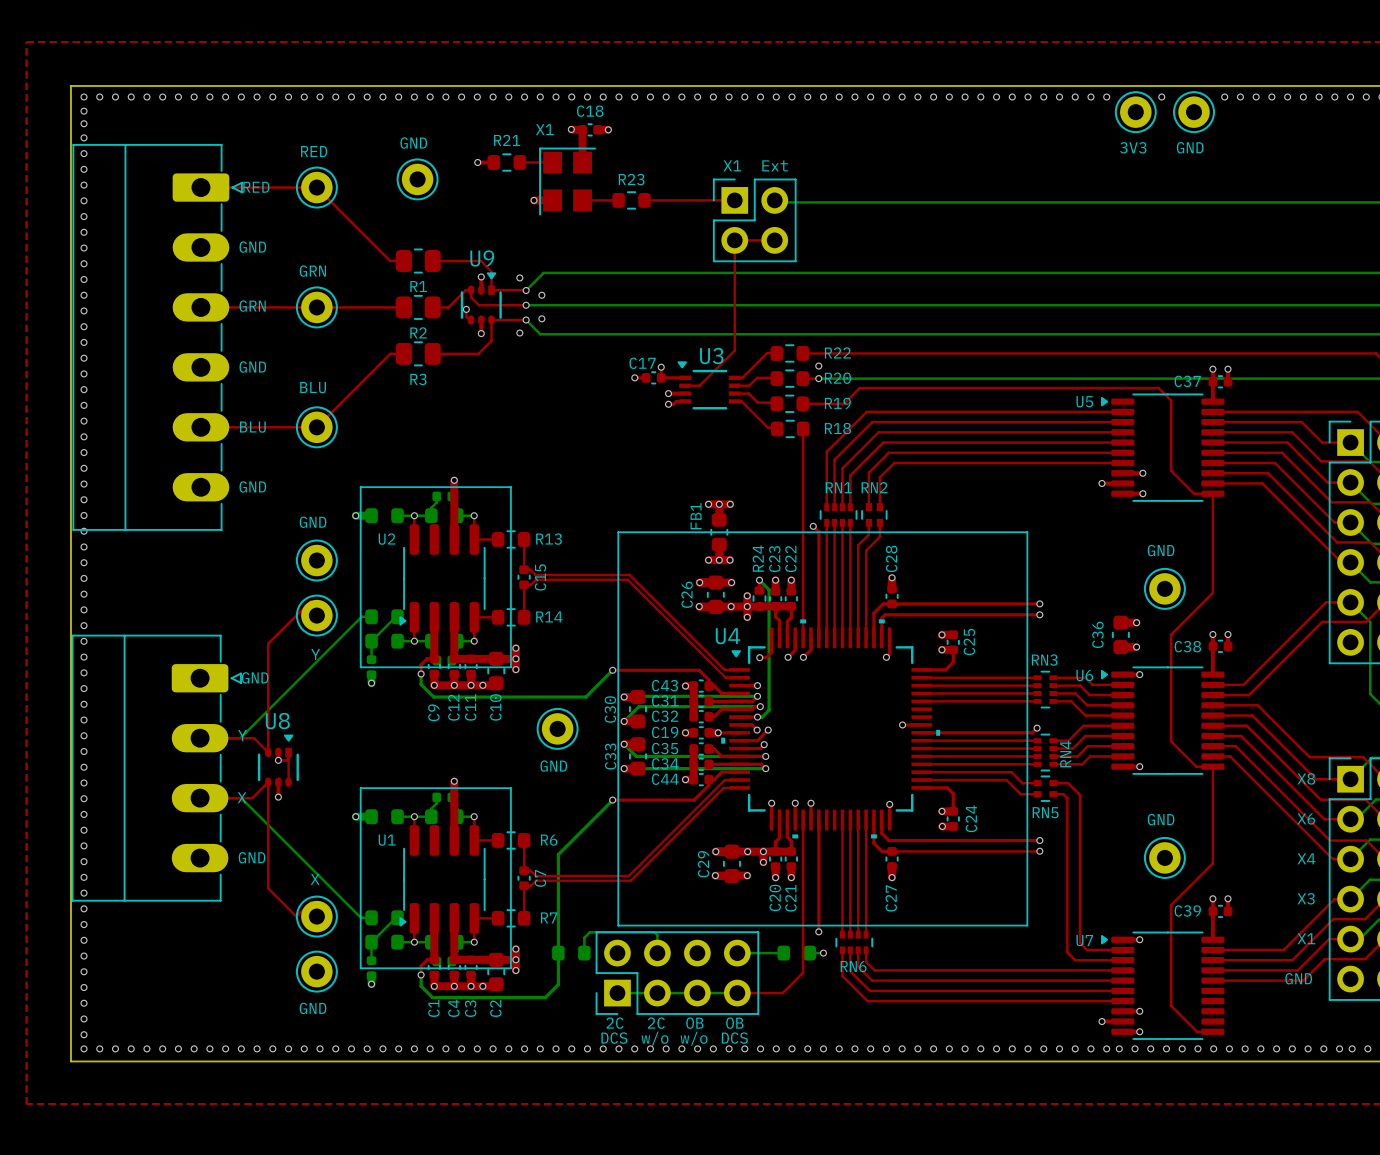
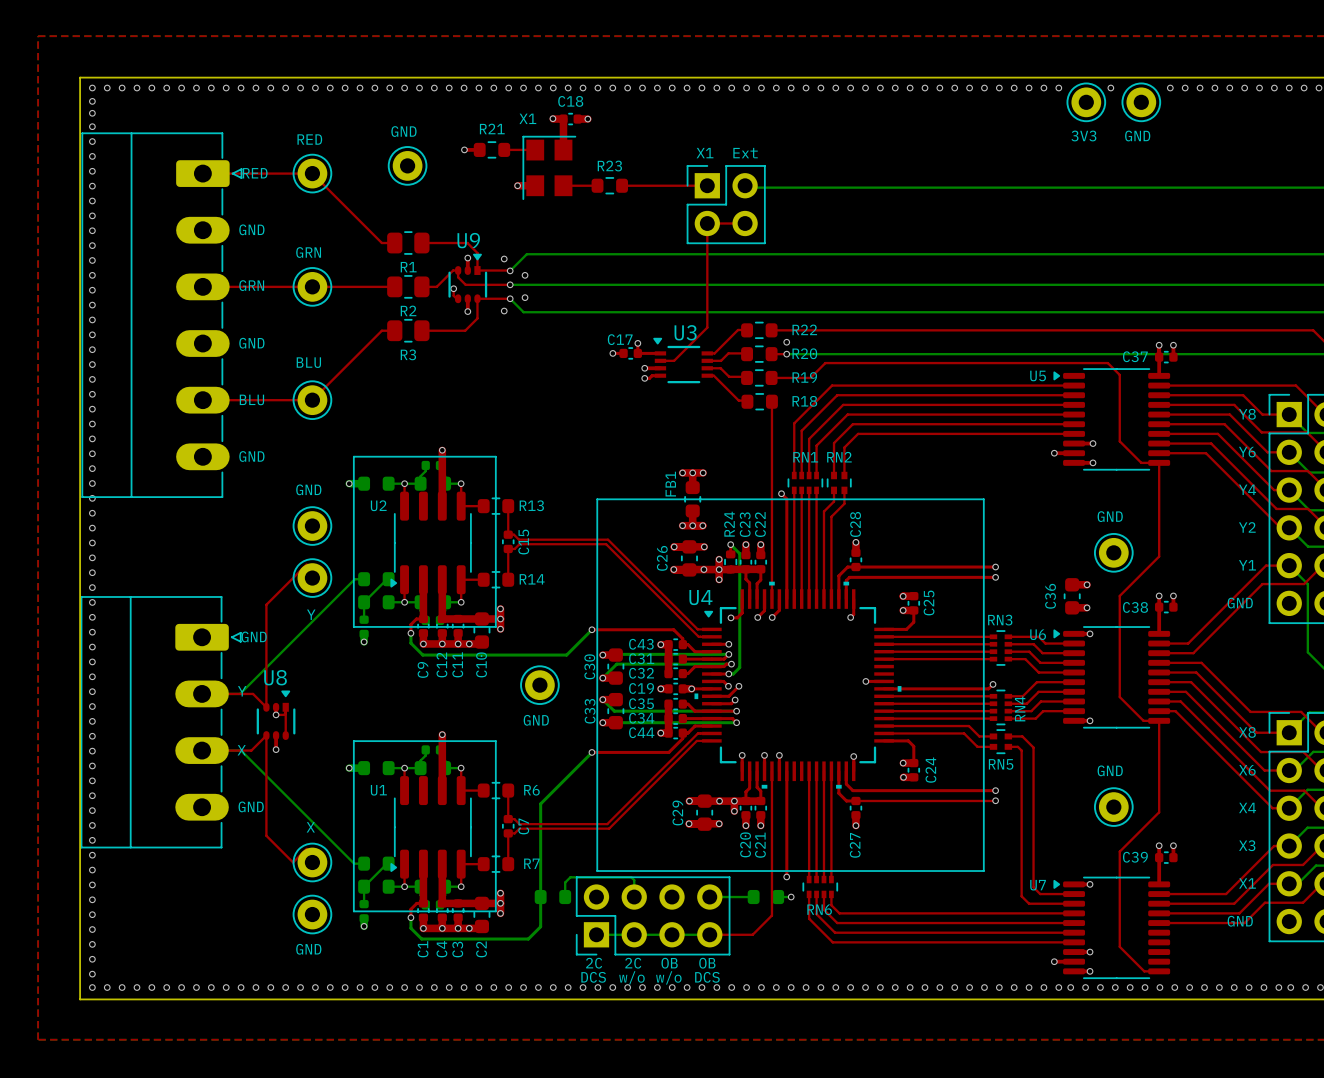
text: none -> Y8 (1247, 414)
text: none -> Y6 (1247, 452)
text: none -> Y4 (1247, 489)
text: none -> Y2 (1247, 527)
text: none -> Y1 (1247, 565)
text: none -> GND (1240, 603)

